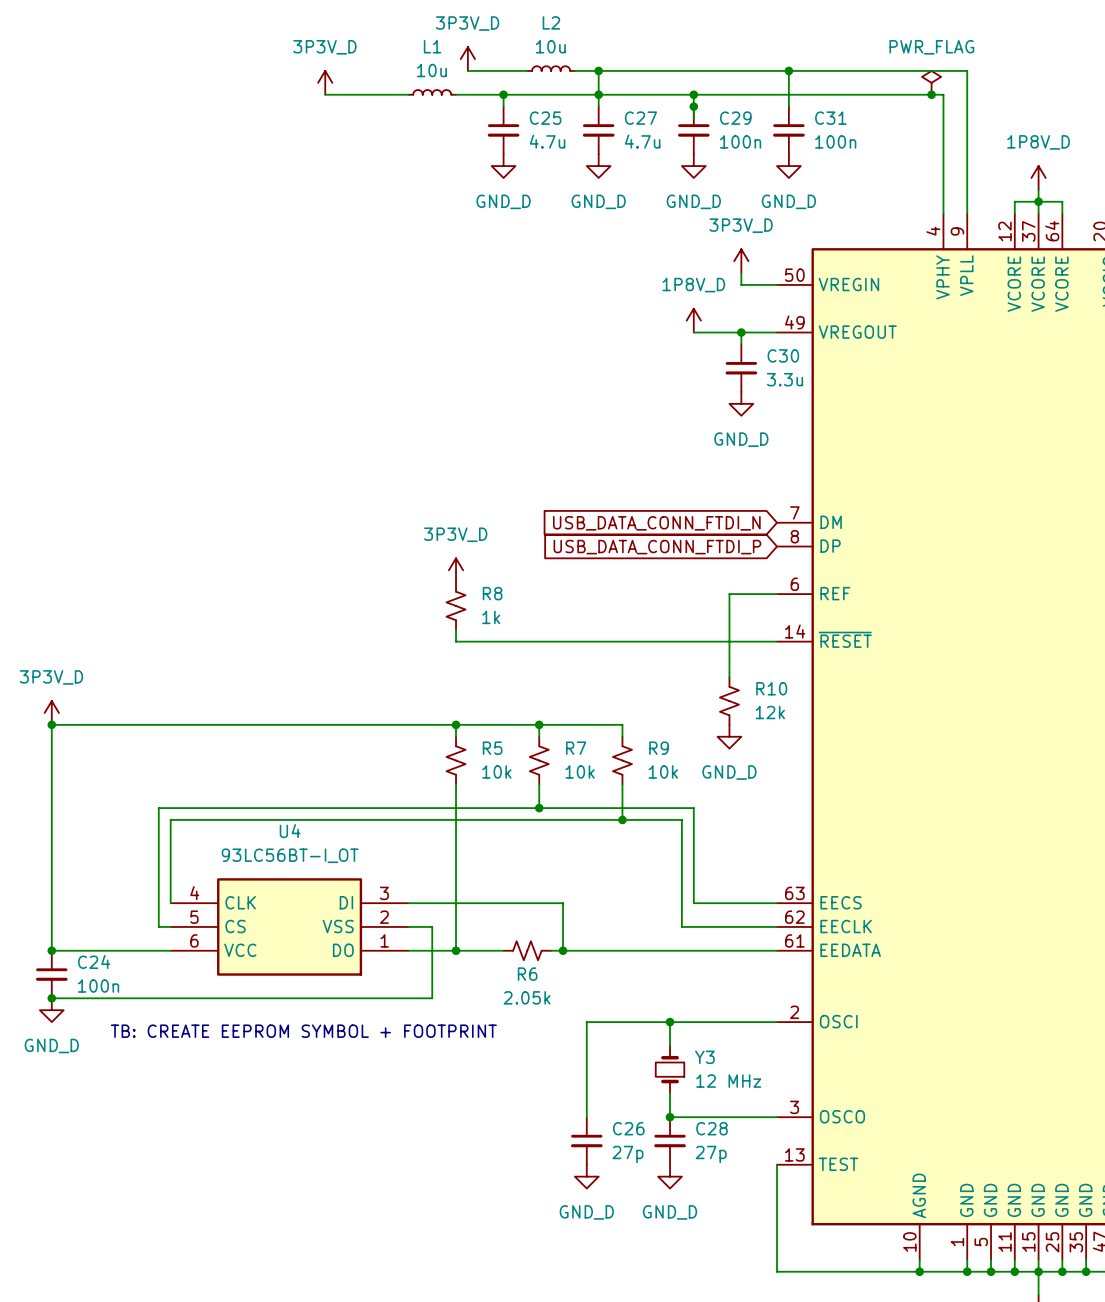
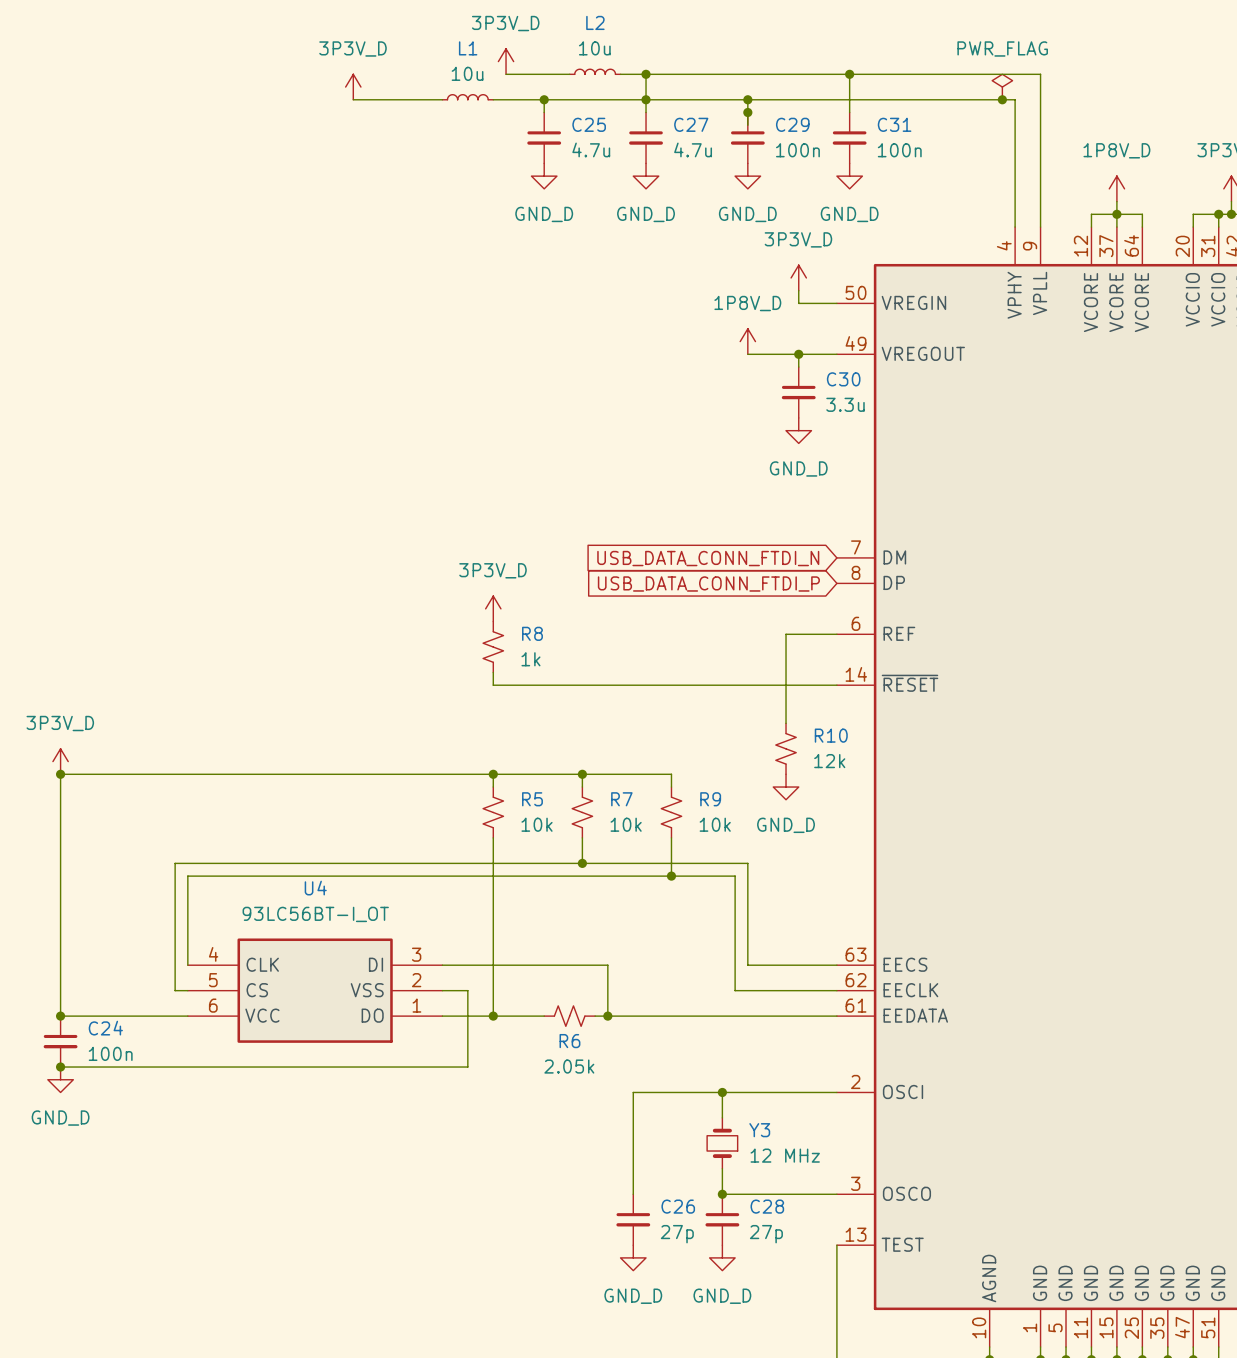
text: TB: CREATE EEPROM SYMBOL + FOOTPRINT (303, 1031) -> none

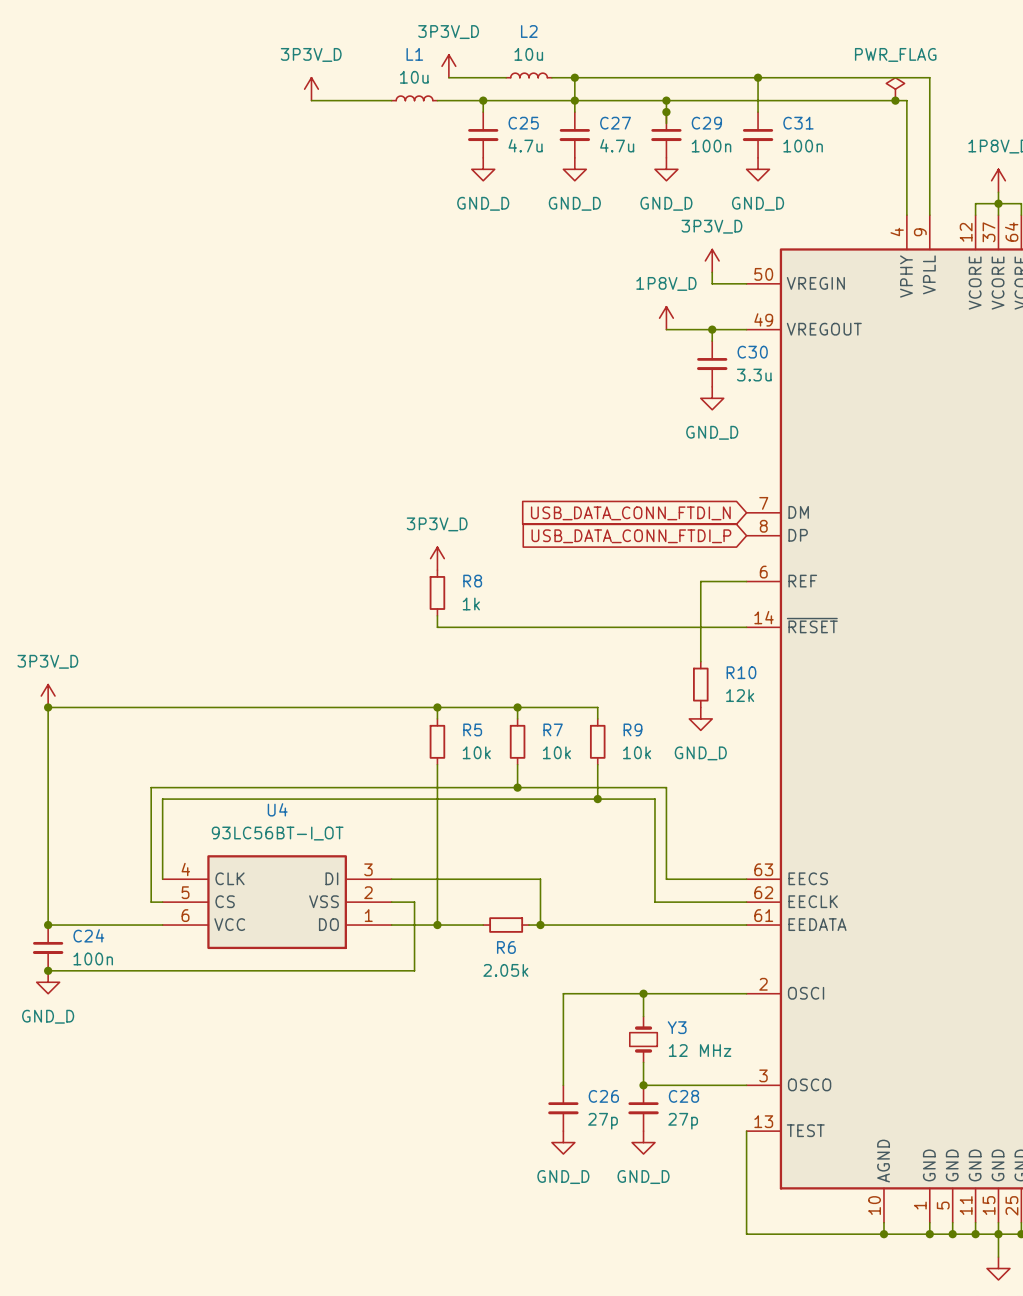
R8 symbol: [483, 621, 504, 673] -> [429, 570, 446, 616]
R10 symbol: [775, 723, 797, 775] -> [693, 661, 709, 708]
R5 symbol: [483, 787, 504, 838] -> [429, 718, 446, 765]
R7 symbol: [572, 787, 593, 838] -> [509, 718, 526, 765]
R9 symbol: [661, 787, 682, 838] -> [589, 718, 606, 765]
R6 symbol: [544, 1005, 596, 1027] -> [483, 917, 530, 933]

